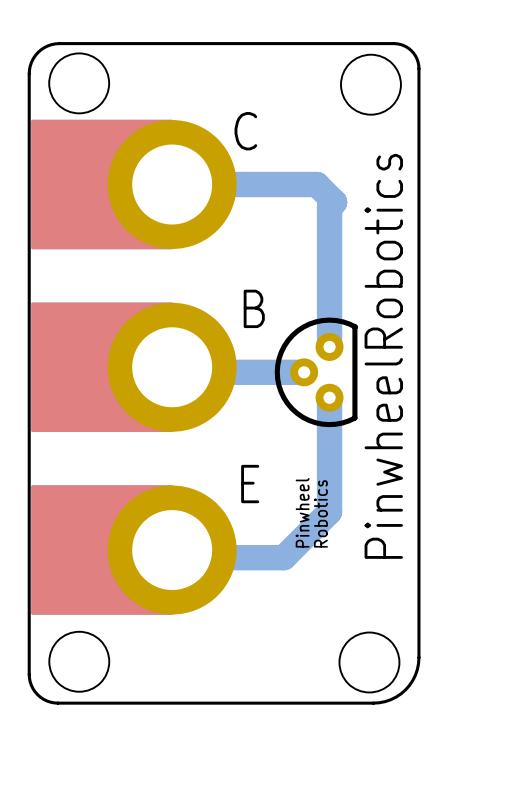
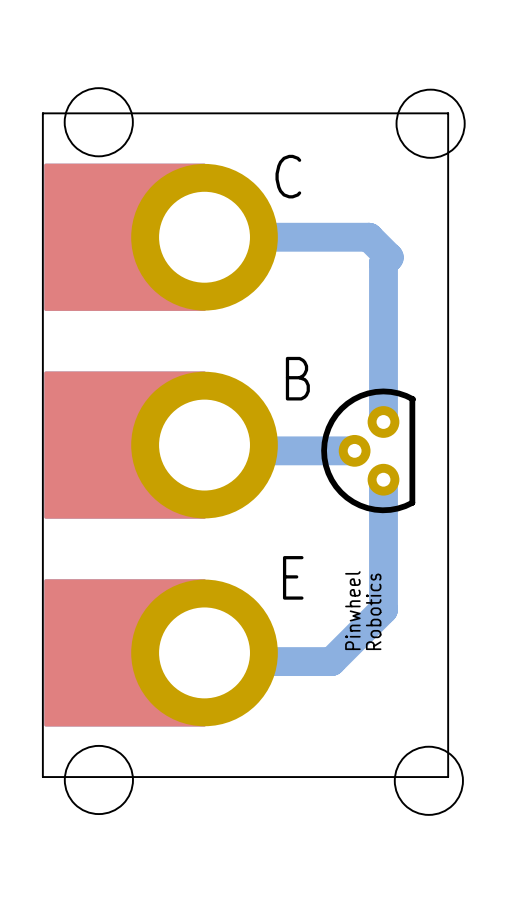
board edge: (59, 43) (393, 43) (406, 46) (415, 56) (418, 68) (418, 657) (417, 669) (412, 680) (405, 689) (396, 697) (385, 701) (373, 703) (57, 703) (43, 699) (33, 688) (29, 674) (29, 73) (31, 62) (38, 52) (47, 45) (59, 43) -> (42, 113) (42, 777) (448, 777) (448, 113) (42, 113)
text: PinwheelRobotics (383, 356) -> none

